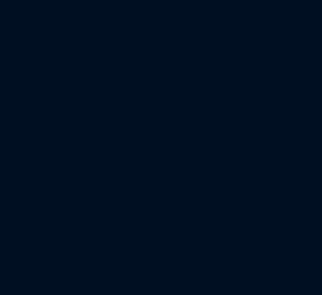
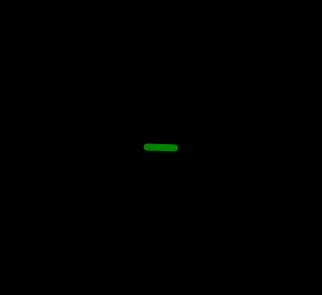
track: none -> (146, 146) (174, 147)

